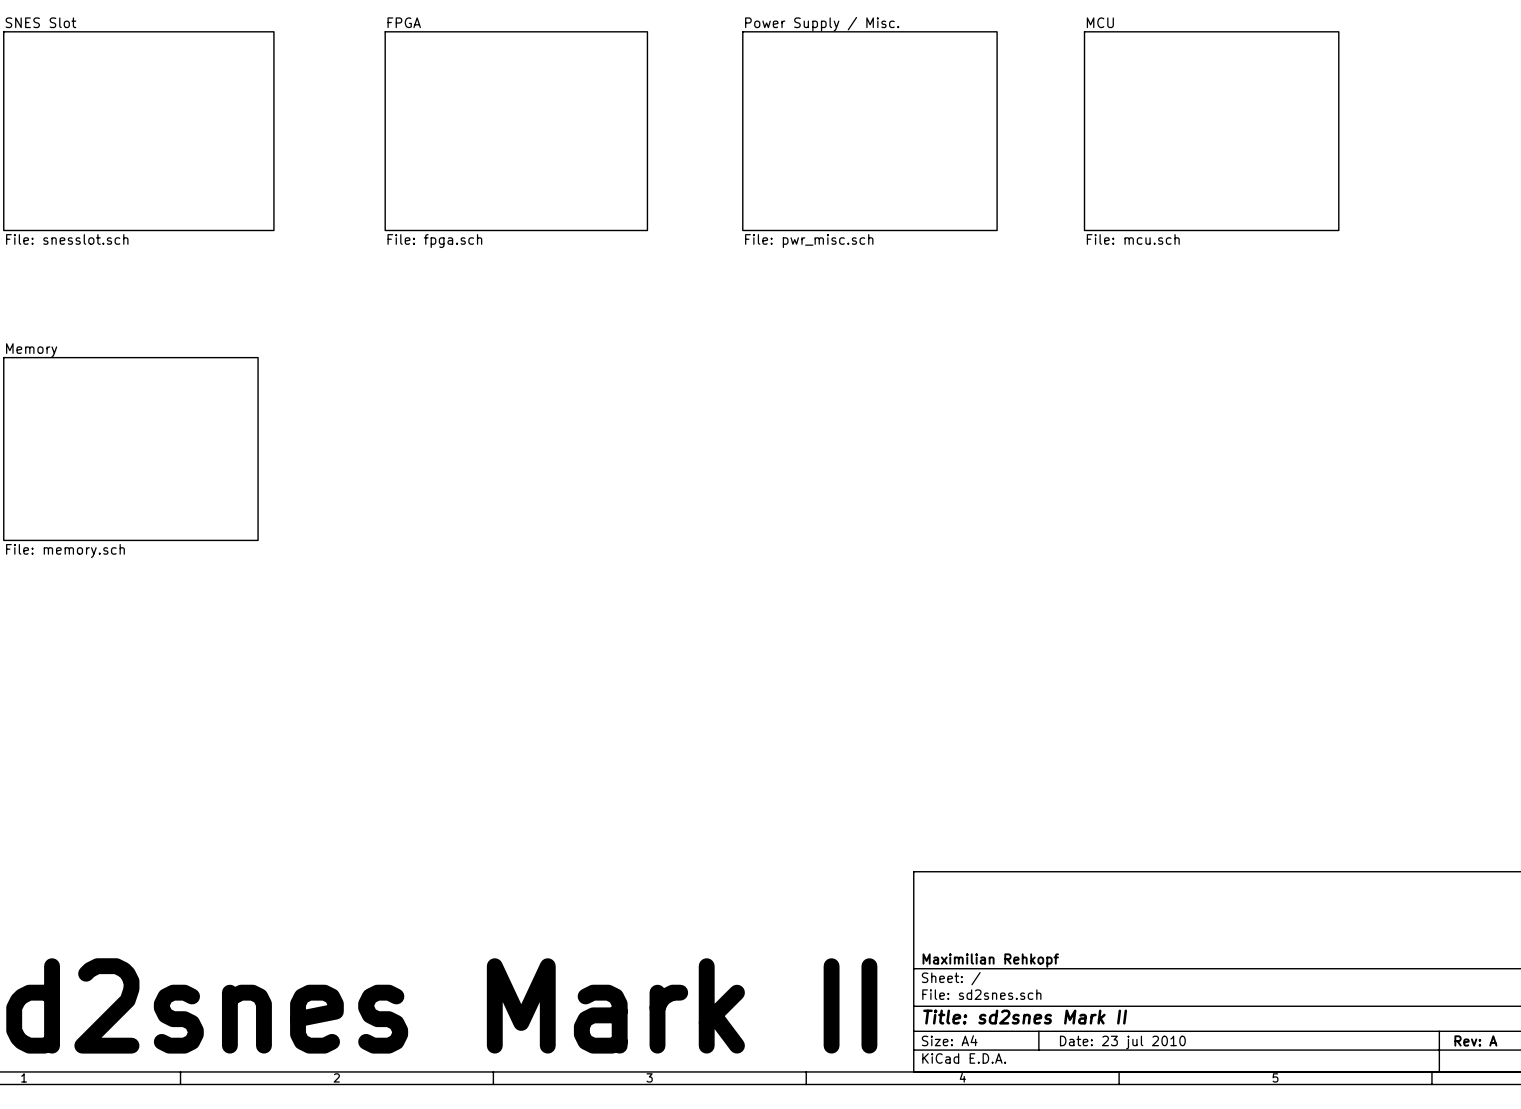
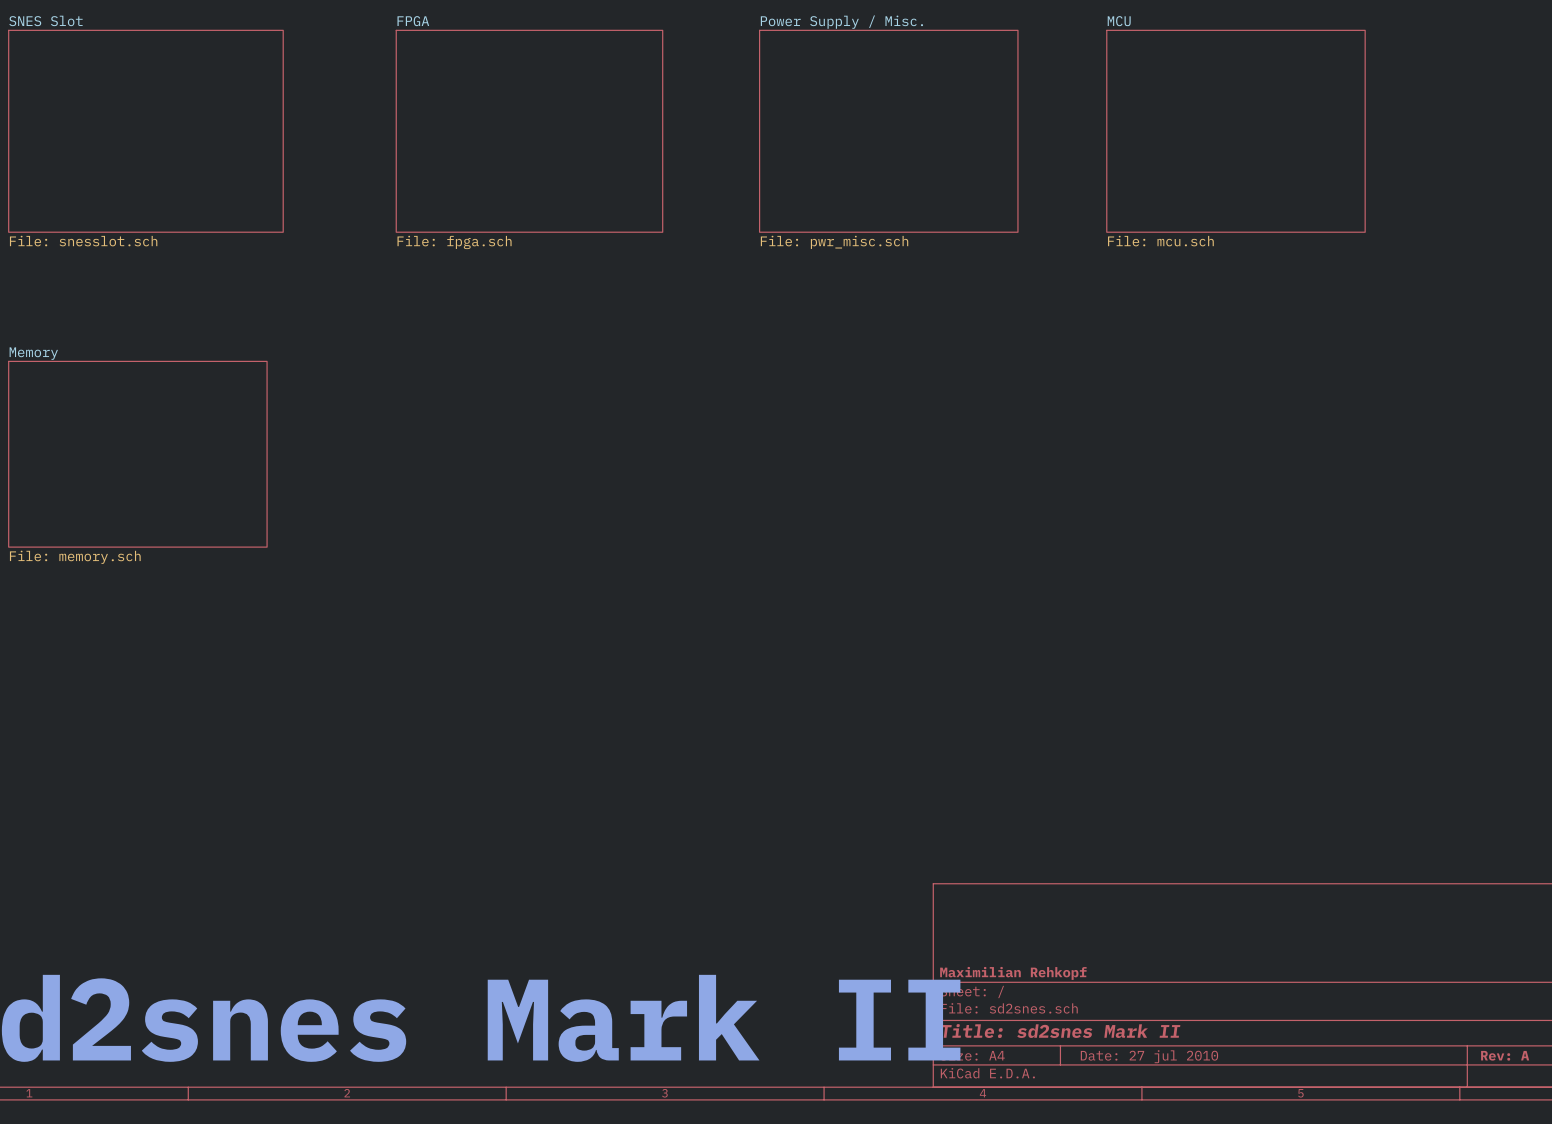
title block: Date: 23 jul 2010 (1122, 1042) -> Date: 27 jul 2010 (1149, 1056)

